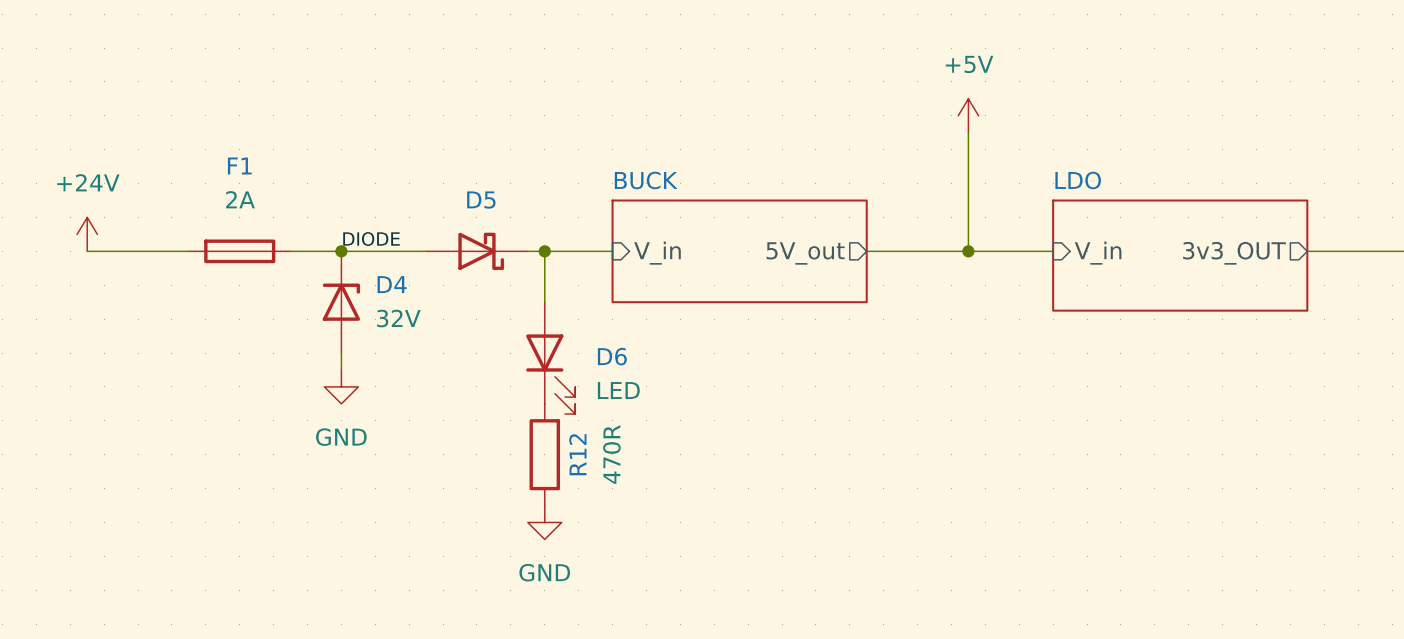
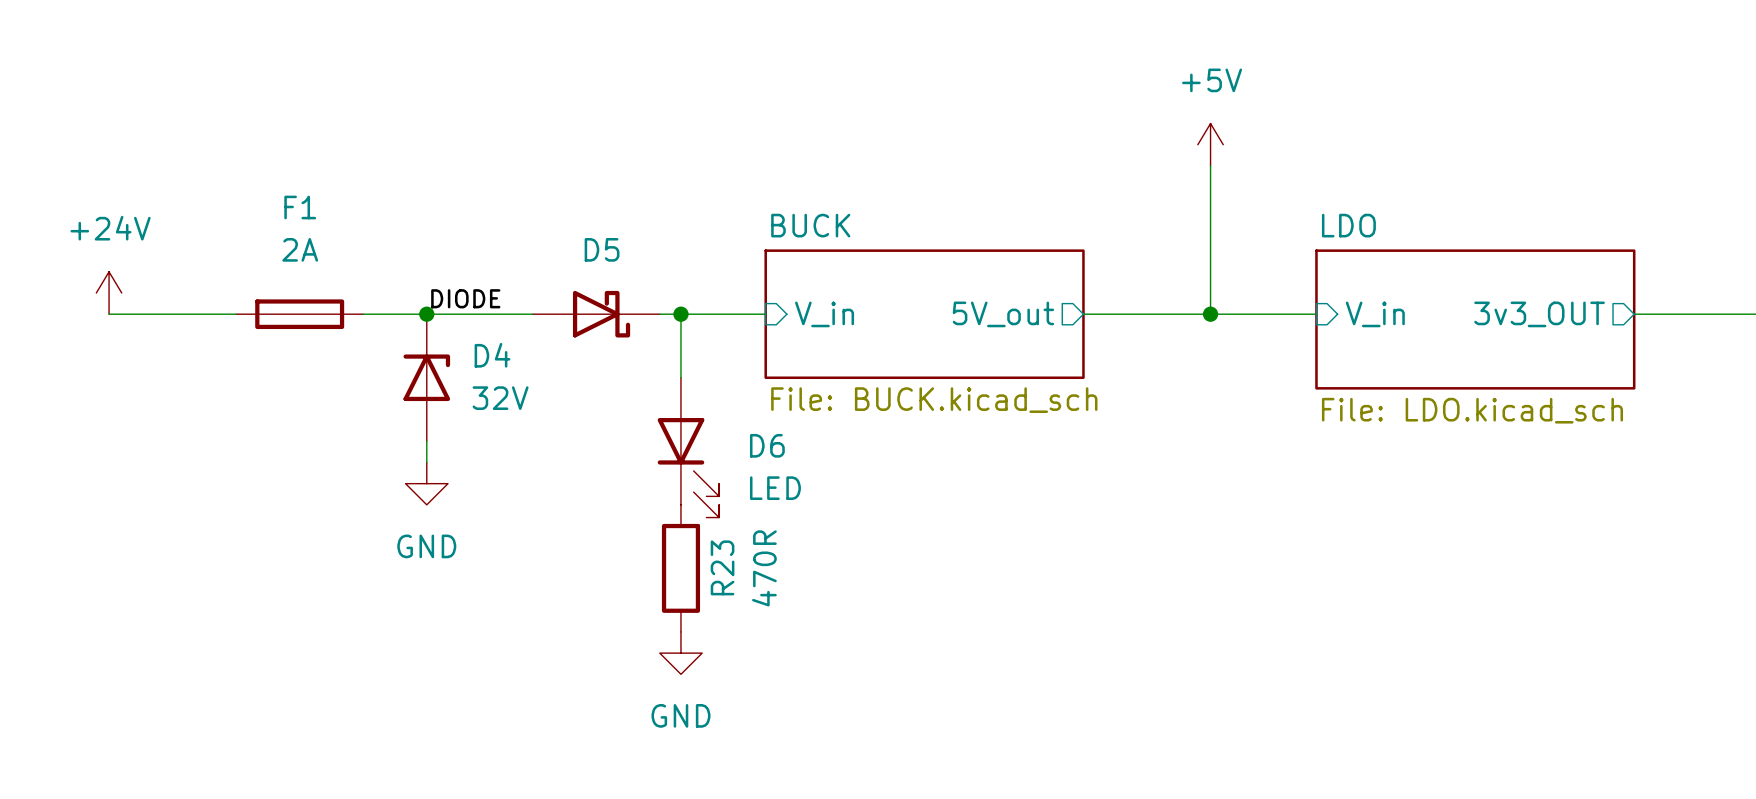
sheet BUCK value: none -> File: BUCK.kicad_sch (934, 400)
sheet LDO value: none -> File: LDO.kicad_sch (1472, 410)
R12 name: R12 (577, 454) -> R23 (722, 567)

